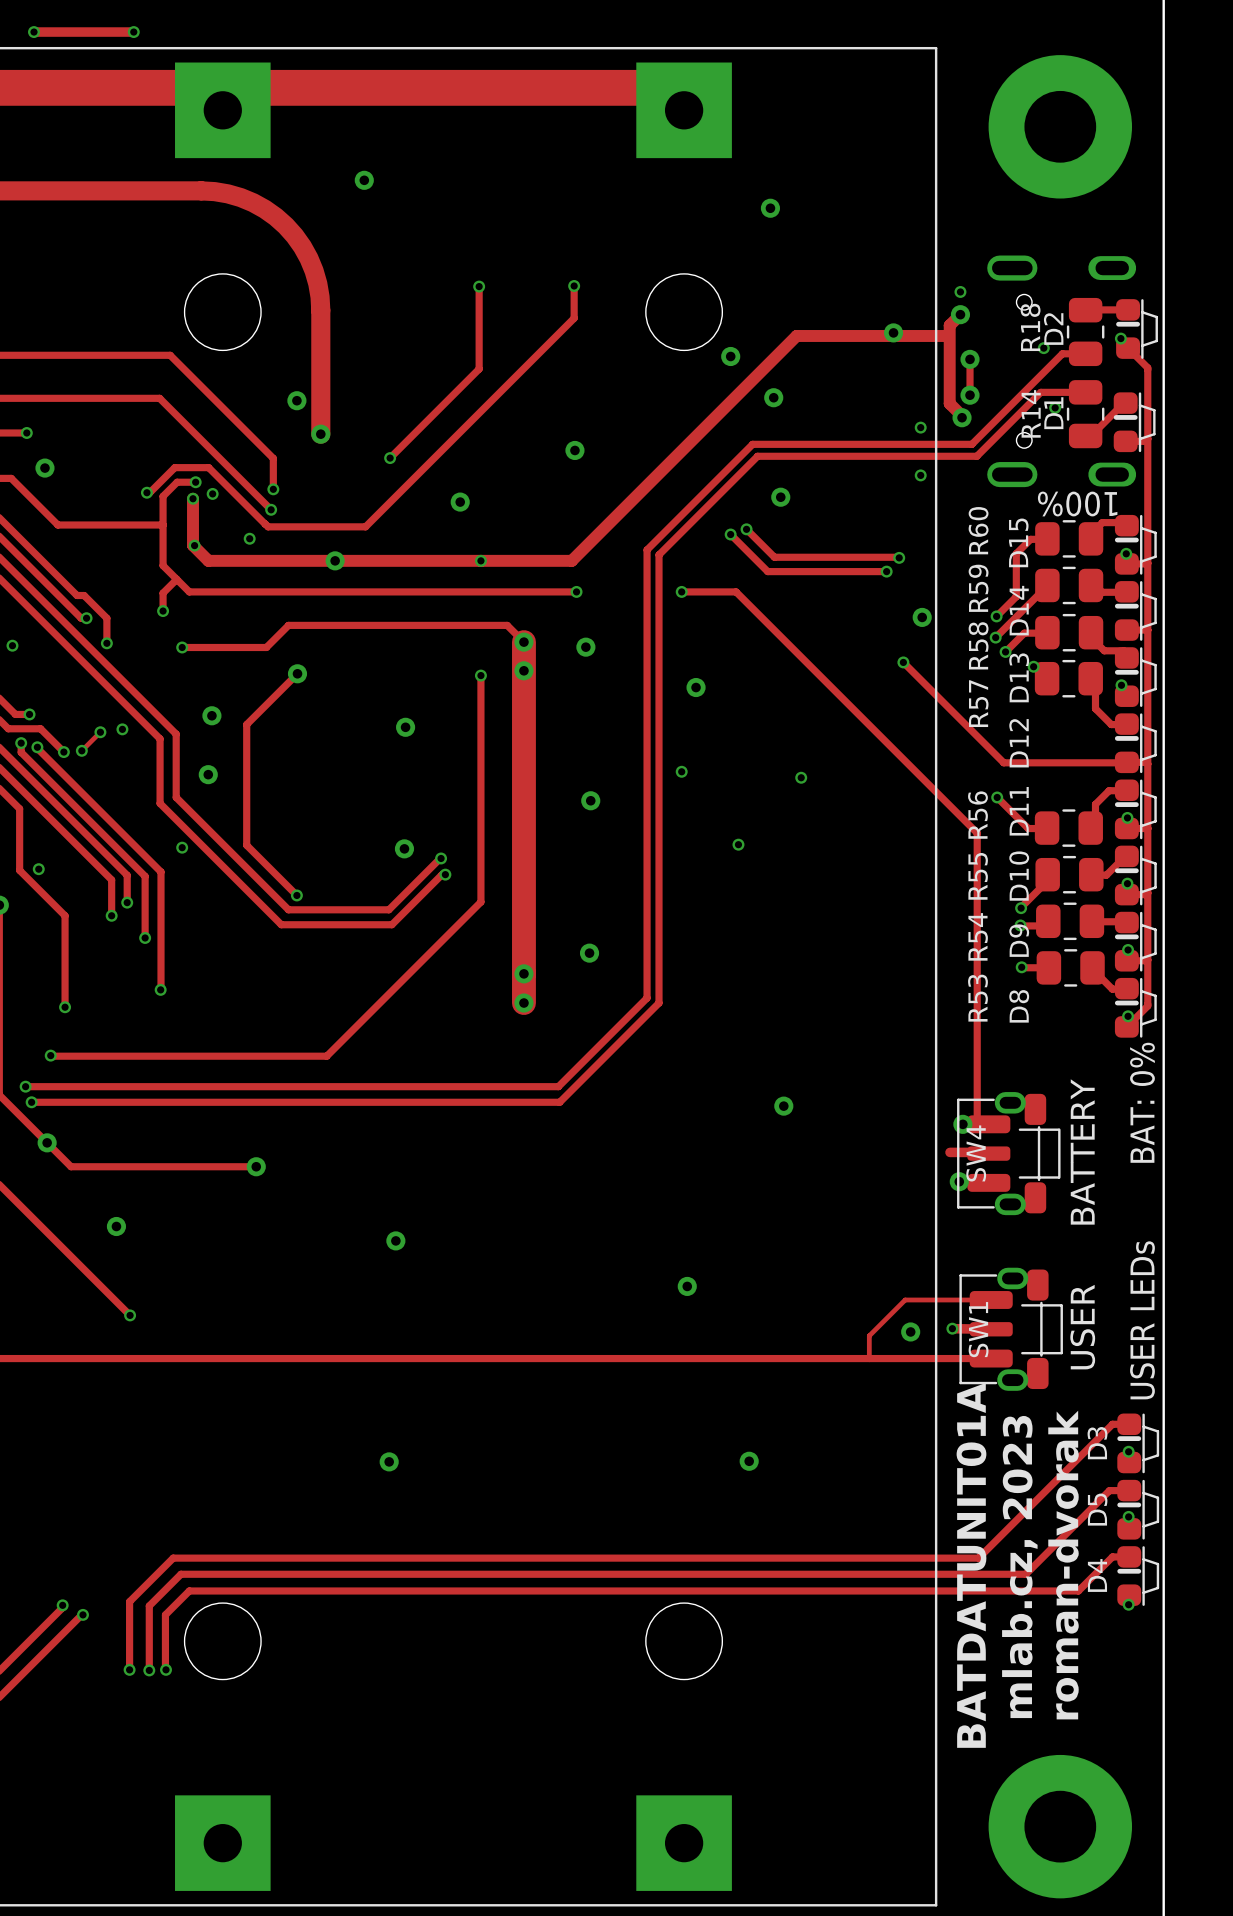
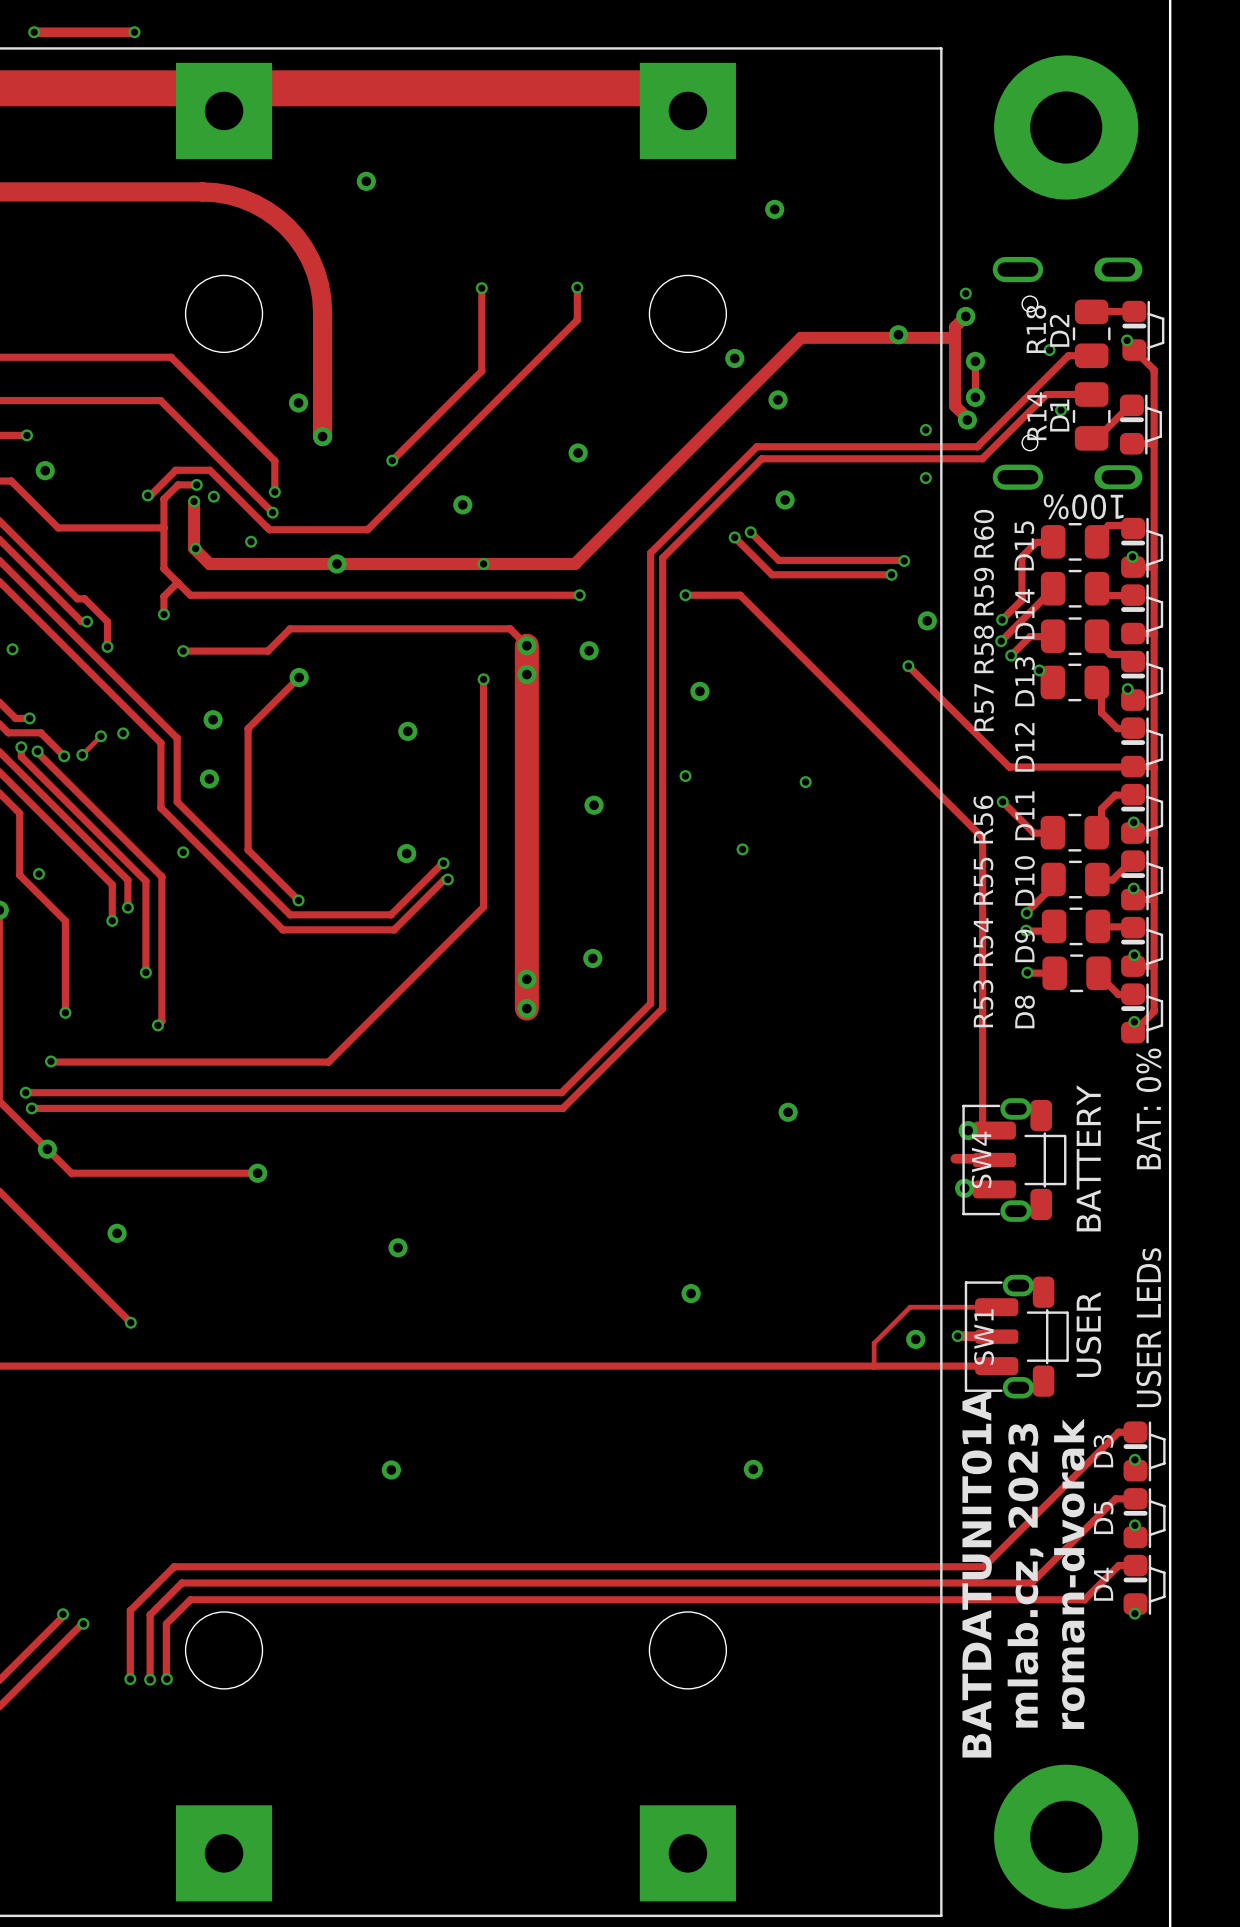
track: none -> (145, 943) (145, 972)
via: (145, 937) -> none
via: none -> (145, 972)
via: (160, 989) -> none
track: none -> (161, 995) (161, 1021) (157, 1025)
via: none -> (157, 1025)

